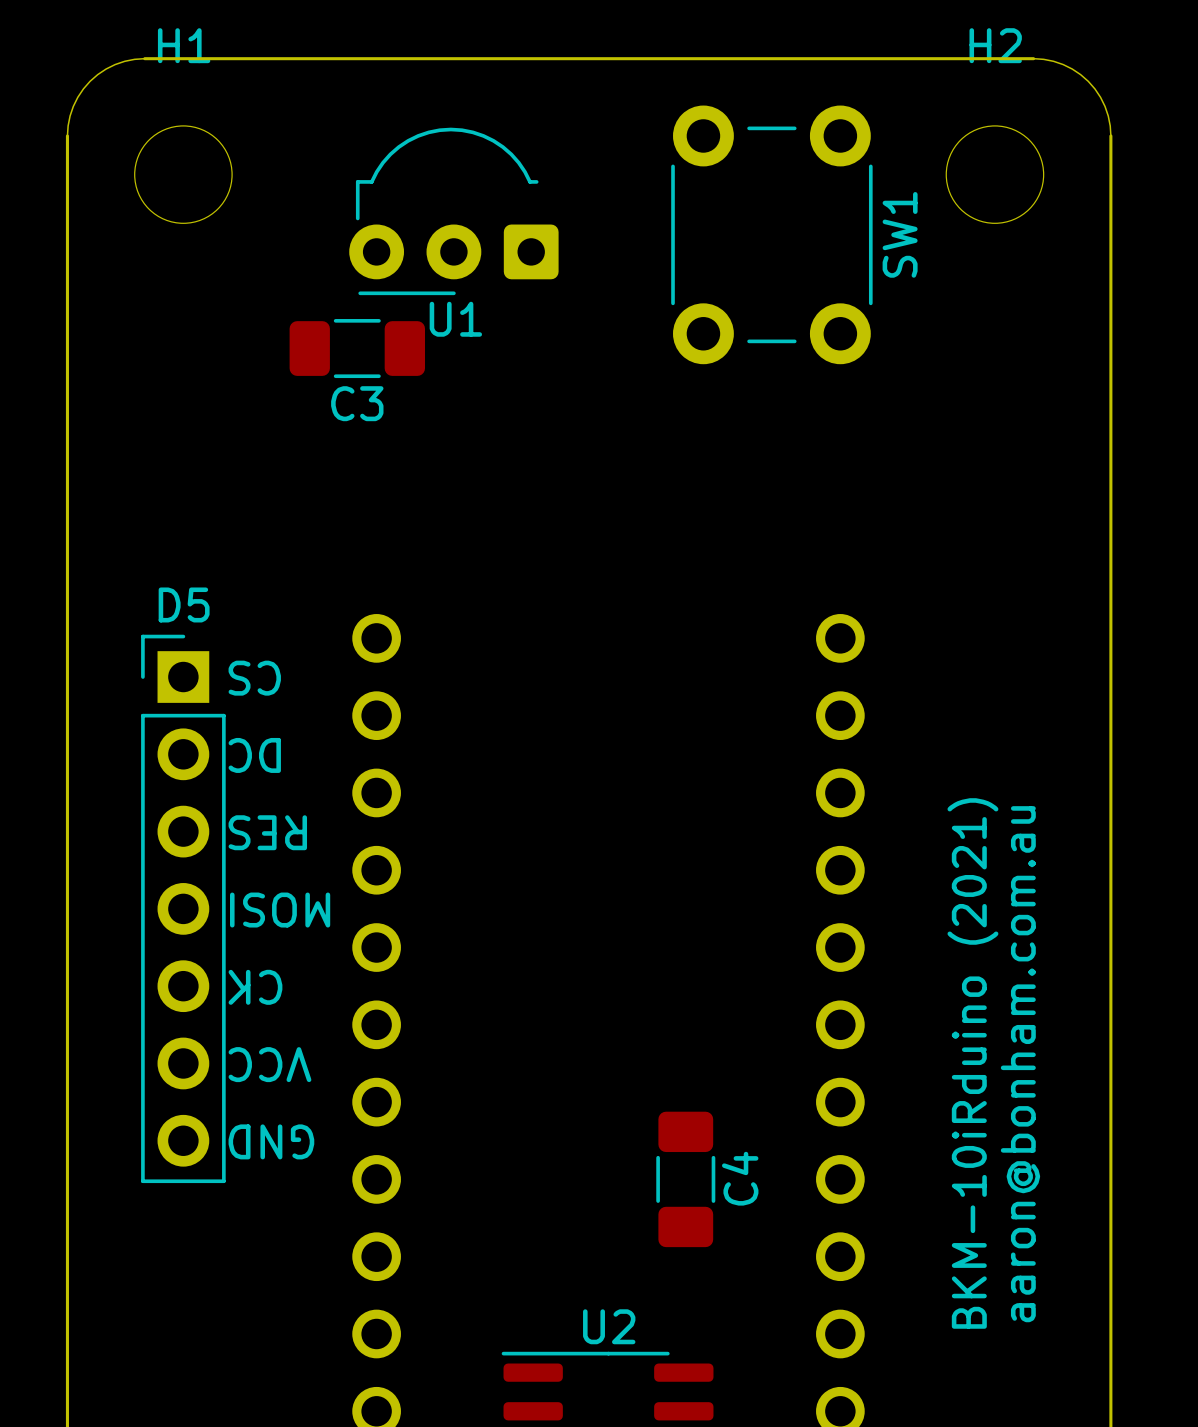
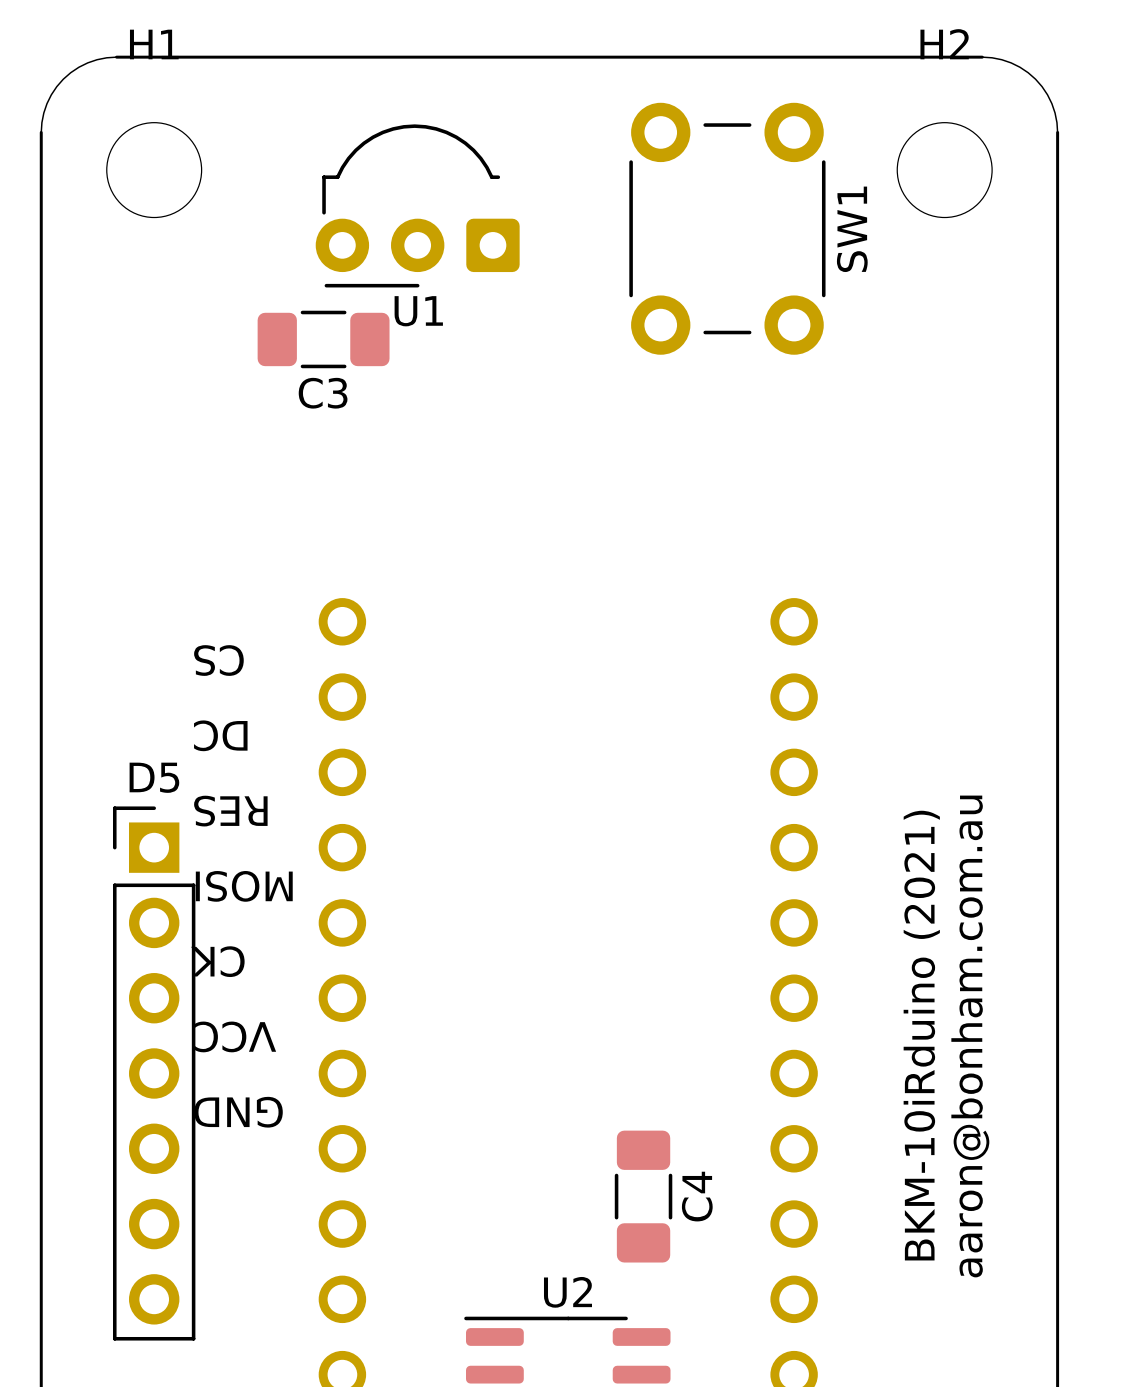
D5 position: (183, 908) -> (154, 1073)
C4 position: (685, 1179) -> (643, 1196)

